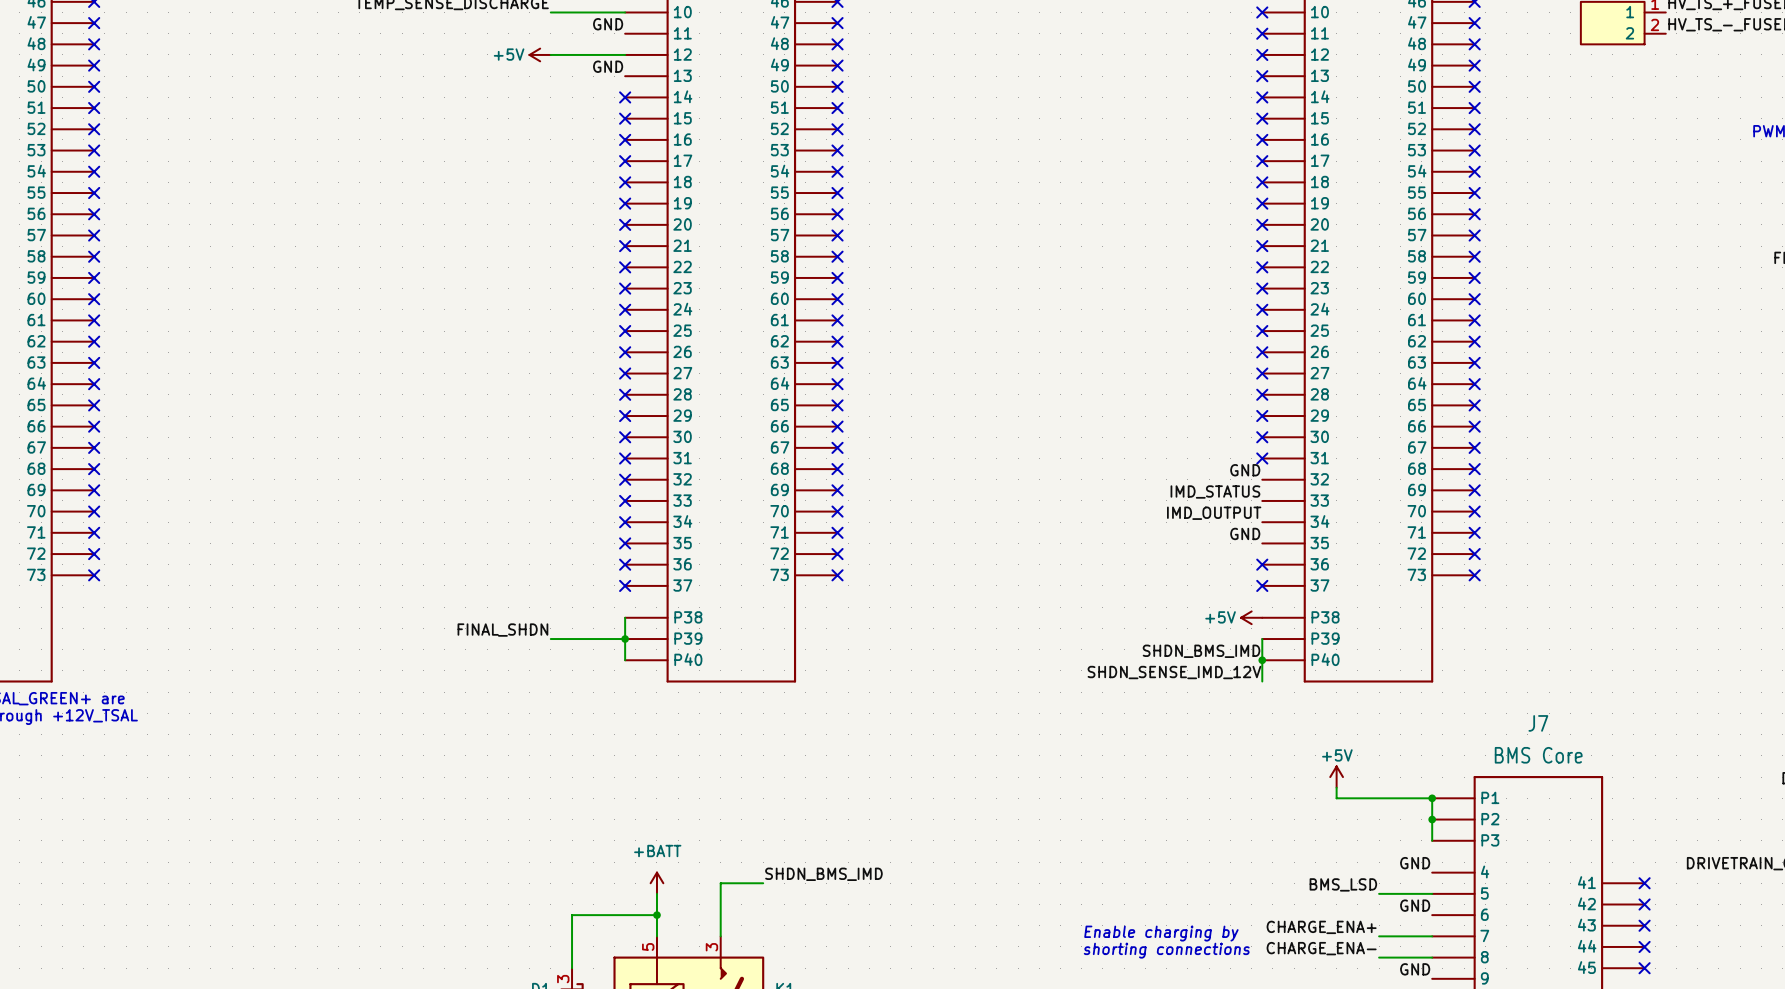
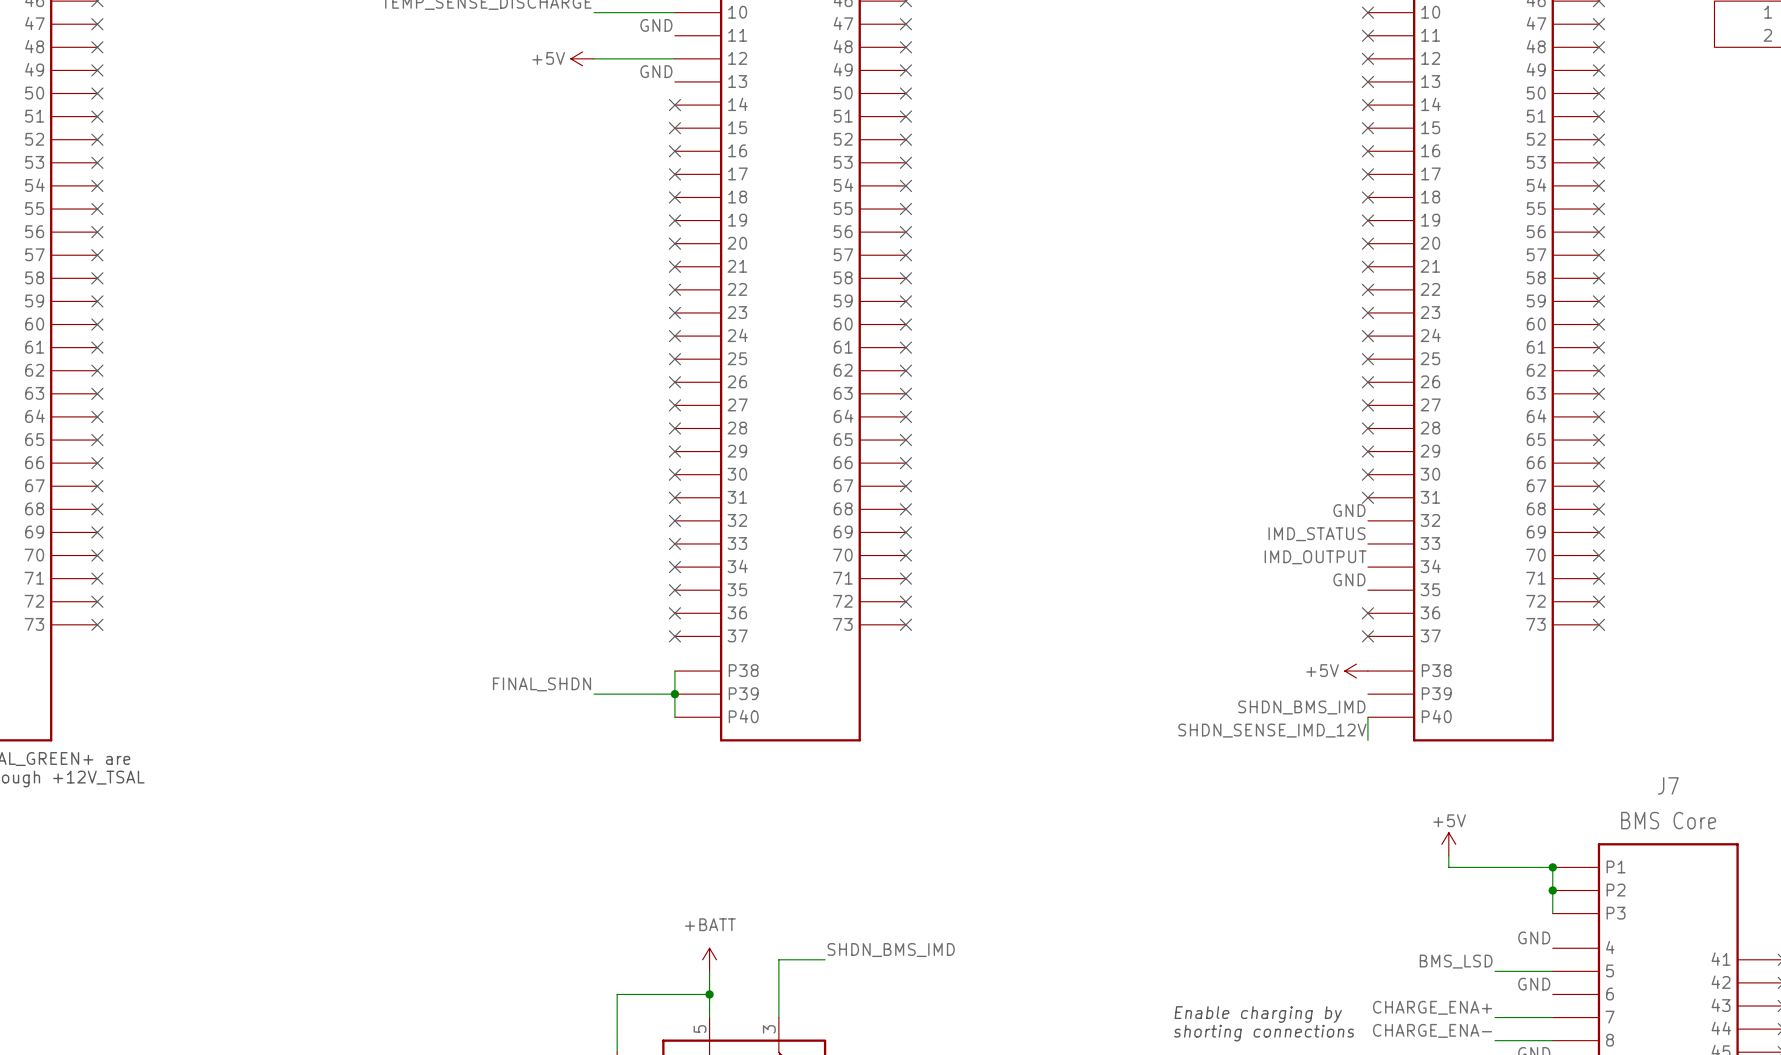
wire: (1262, 639) (1262, 660) -> none
junction: (1262, 660) -> none

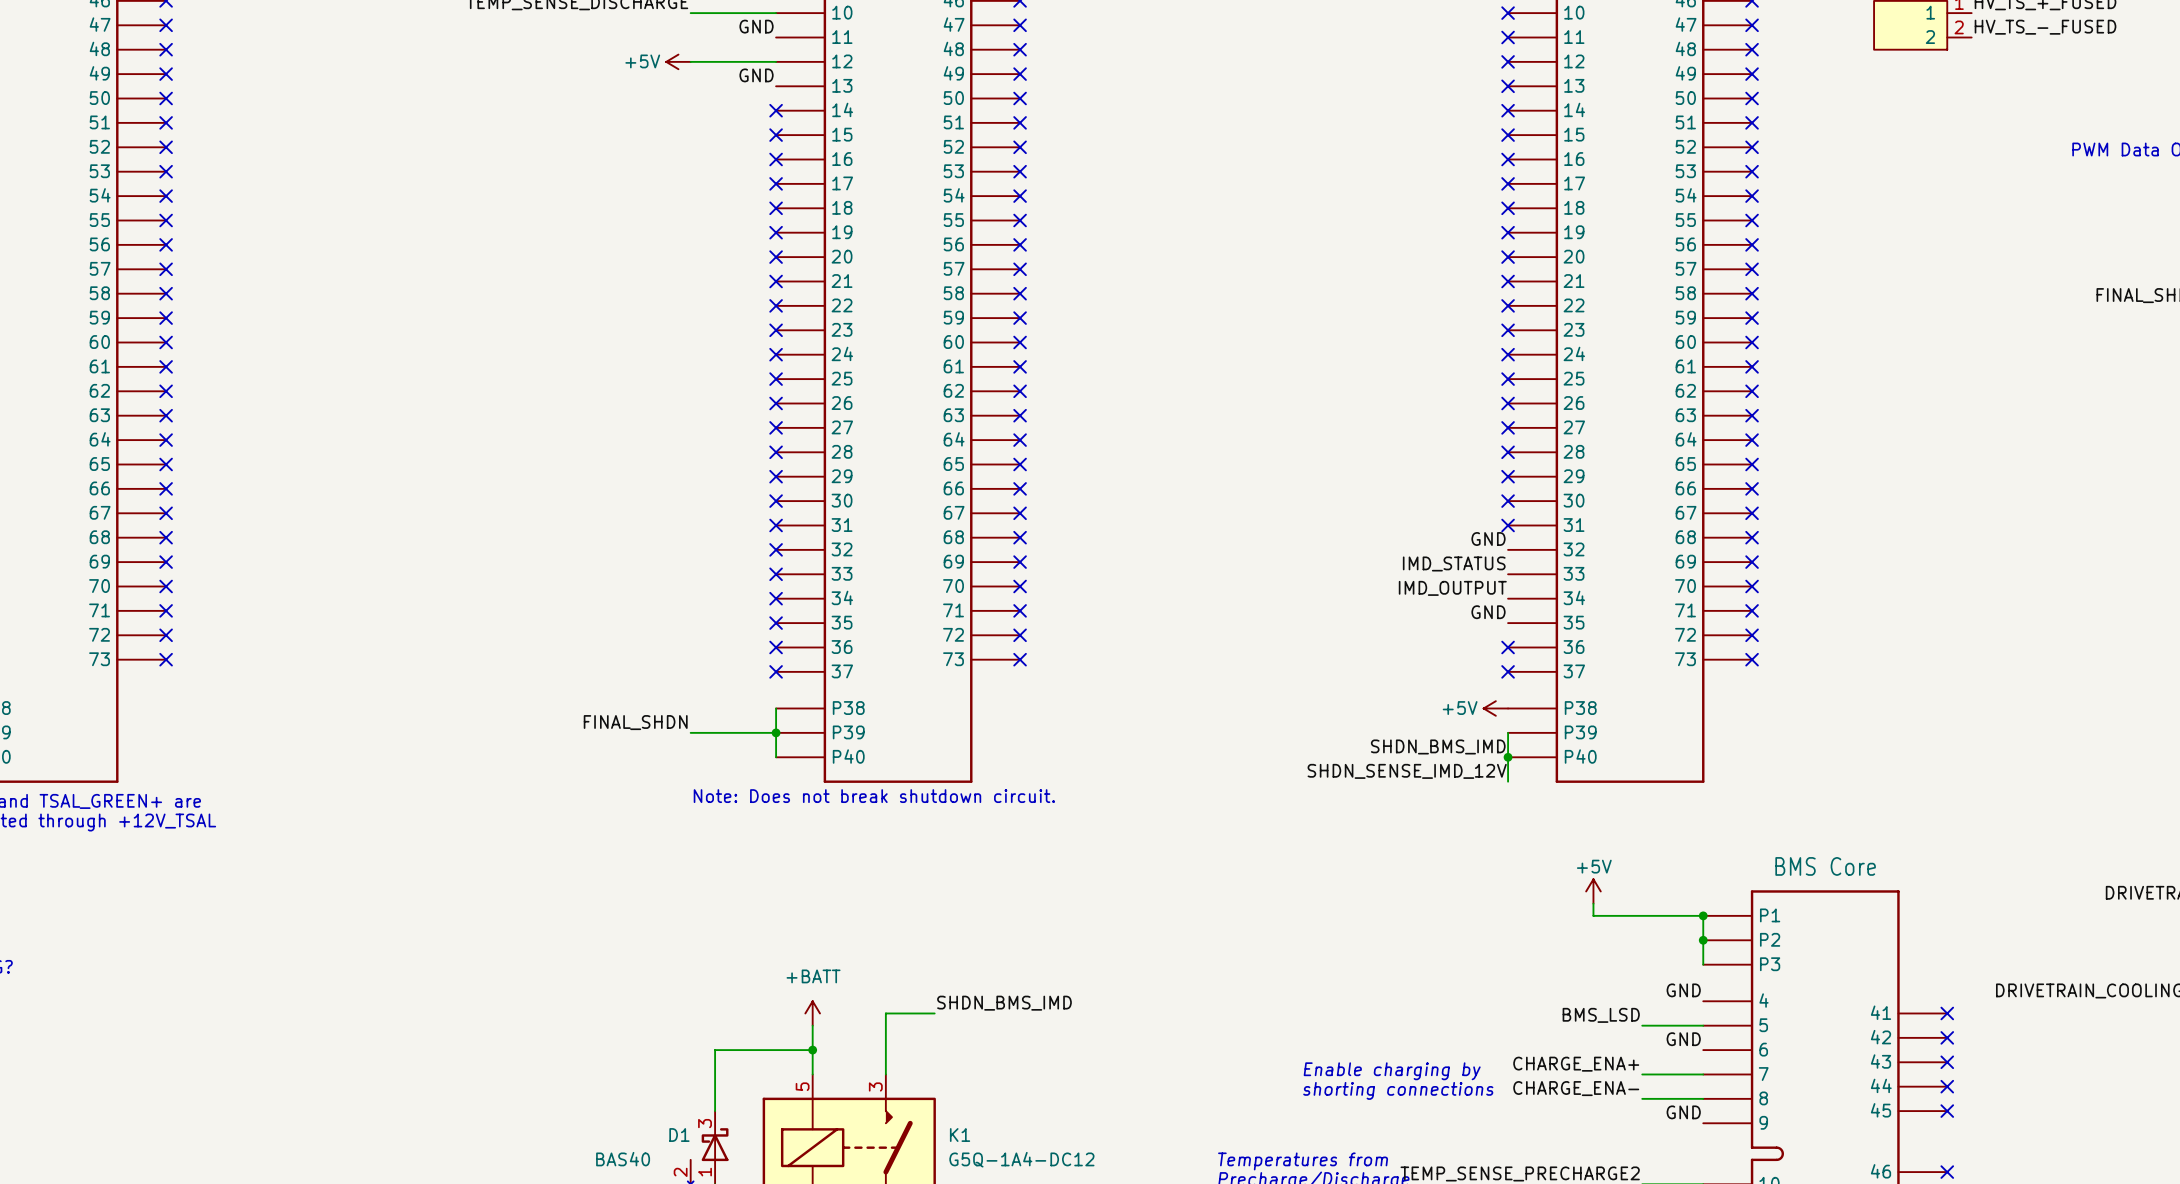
wire: none -> (1508, 732) (1508, 757)
junction: none -> (1508, 757)
text: none -> Note: Does not break shutdown circuit. (874, 796)
J7 name: J7 (1668, 785) -> none

